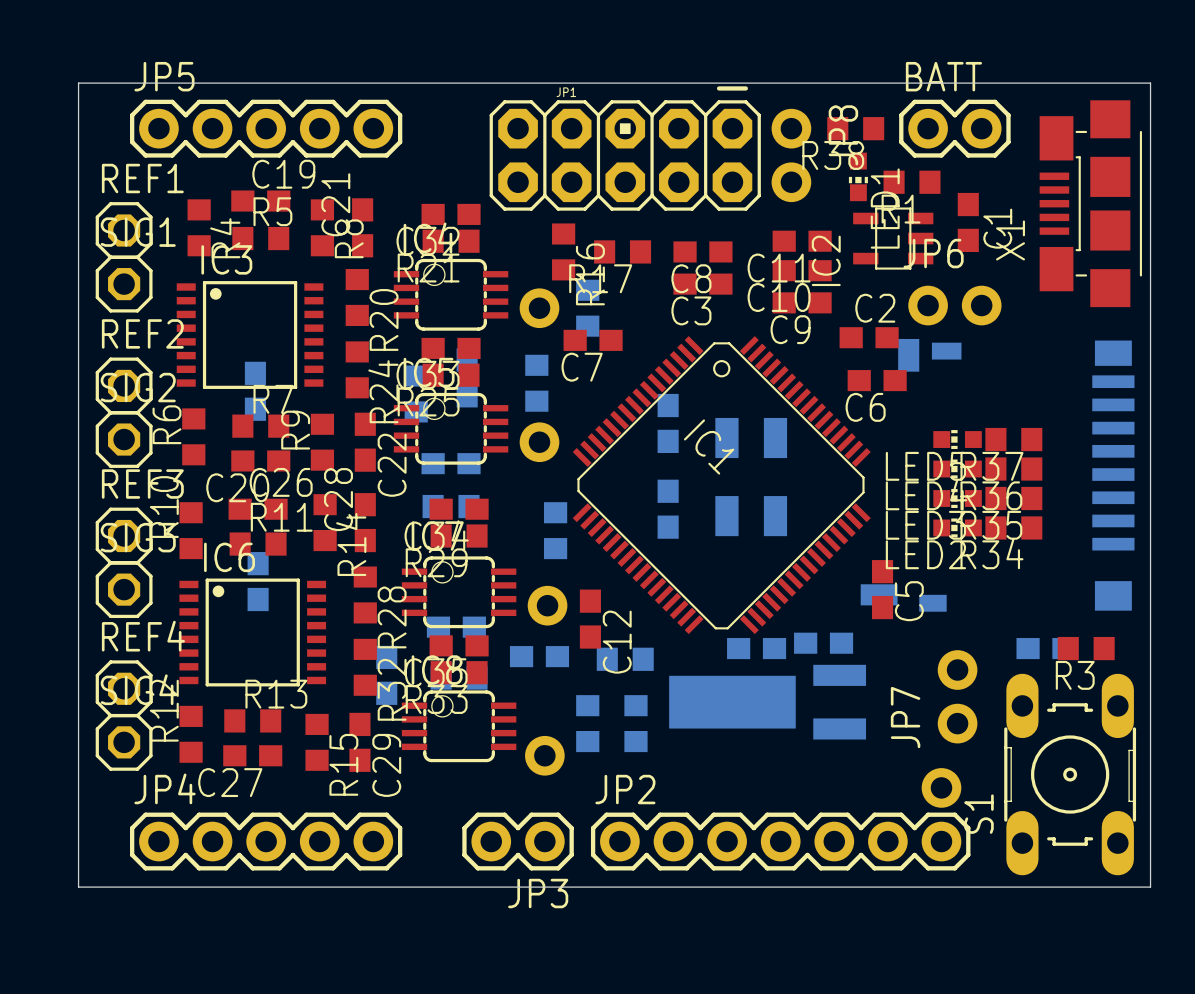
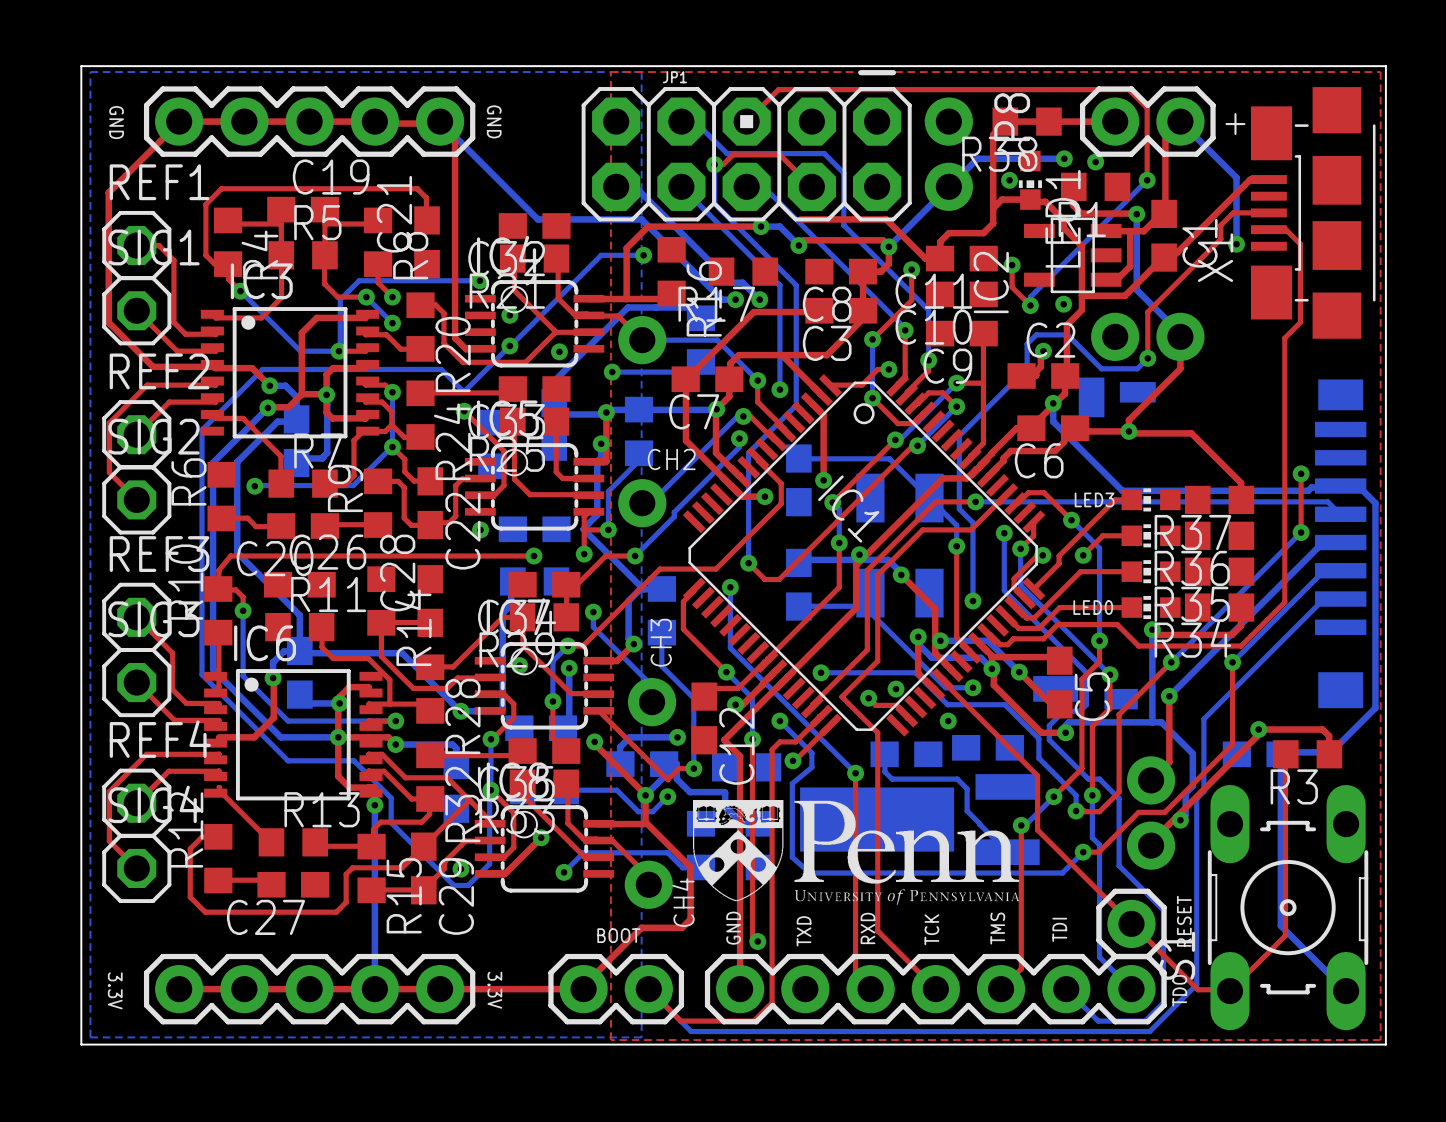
JP5 name: JP5 (164, 76) -> none
BATT name: BATT (943, 76) -> none
bottom zone outline: none -> (90, 72) (641, 72) (641, 1037) (90, 1037) (90, 72)
top zone outline: none -> (610, 72) (1380, 72) (1380, 1040) (610, 1040) (610, 72)
bottom track: none -> (440, 121) (537, 219) (641, 219) (721, 299) (735, 299)
text: none -> GND (494, 121)
bottom track: none -> (681, 121) (695, 121) (727, 153) (824, 153) (843, 173) (843, 225) (928, 310) (928, 360)
top track: none -> (746, 121) (778, 89) (1128, 89) (1147, 107) (1147, 180)
top track: none -> (1115, 121) (1004, 121) (993, 134) (993, 223) (983, 233) (948, 233) (940, 241) (940, 258) (925, 258) (886, 219) (800, 219)
top track: none -> (1180, 121) (1165, 136) (1164, 213)
bottom track: none -> (1180, 121) (1236, 177) (1236, 244)
text: none -> GND (116, 122)
text: none -> + (1235, 124)
bottom track: none -> (1064, 158) (977, 158) (888, 246)
via: none -> (1064, 158)
via: none -> (1095, 162)
top track: none -> (714, 164) (723, 164) (732, 154) (779, 154) (811, 186)
bottom track: none -> (714, 164) (714, 203) (796, 285) (796, 405) (748, 452) (748, 563)
via: none -> (714, 164)
via: none -> (1009, 180)
bottom track: none -> (1147, 180) (1030, 297) (1030, 305)
via: none -> (1147, 180)
top track: none -> (1268, 179) (1250, 179) (1172, 257) (1164, 257)
bottom track: none -> (616, 186) (635, 186) (731, 282) (742, 282) (759, 299)
bottom track: none -> (681, 186) (779, 285) (779, 389)
bottom track: none -> (746, 186) (763, 186) (905, 330)
top track: none -> (1073, 186) (1073, 205) (1081, 213) (1136, 214)
top track: none -> (993, 208) (1002, 199) (1045, 201) (1063, 220) (1063, 227) (1081, 246) (1081, 310) (1066, 325) (1066, 373) (1065, 375)
top track: none -> (1268, 212) (1233, 212) (1220, 225) (1220, 239) (1147, 312) (1147, 358)
bottom track: none -> (1136, 214) (1136, 289) (1180, 333) (1180, 336)
via: none -> (1136, 214)
top track: none -> (1164, 214) (1160, 214) (1143, 231) (1106, 230)
top track: none -> (228, 220) (231, 224) (281, 224) (281, 265) (279, 253)
top track: none -> (378, 220) (374, 224) (324, 224) (324, 265)
top track: none -> (427, 220) (426, 197) (417, 188) (221, 188) (205, 204) (205, 255) (214, 263) (228, 264) (228, 279) (240, 291)
top track: none -> (761, 226) (648, 226) (626, 248) (626, 299)
bottom track: none -> (761, 226) (779, 226) (798, 245)
via: none -> (761, 226)
top track: none -> (1269, 229) (1286, 229) (1300, 244) (1300, 322) (1284, 338) (1284, 602) (1241, 646) (1138, 646) (1117, 624) (1057, 624) (1043, 638) (1013, 638) (1007, 644) (1000, 644) (988, 634)
top track: none -> (1130, 231) (1130, 266) (1117, 279) (1106, 279)
via: none -> (1236, 244)
top track: none -> (136, 245) (158, 245) (173, 260) (173, 322) (185, 334) (215, 334)
top track: none -> (798, 245) (804, 240) (882, 240) (888, 246) (888, 263) (881, 271) (863, 271) (863, 318) (826, 355) (738, 355) (730, 363) (729, 396) (716, 409) (716, 452) (739, 476)
via: none -> (798, 245)
via: none -> (888, 246)
bottom track: none -> (643, 255) (601, 255) (464, 391) (441, 369) (262, 369) (202, 430) (202, 674) (288, 760) (353, 760) (391, 798) (391, 822) (453, 885) (468, 885) (489, 863) (490, 739)
via: none -> (643, 255)
top track: none -> (1164, 257) (1124, 295) (1081, 295)
top track: none -> (512, 258) (514, 260) (514, 290) (555, 332)
top track: none -> (556, 258) (558, 260) (558, 298) (573, 314) (618, 315) (642, 340)
top track: none -> (380, 263) (378, 264) (378, 282) (392, 297)
top track: none -> (1012, 265) (1012, 287) (1030, 305)
via: none -> (1012, 265)
top track: none -> (281, 266) (281, 297) (261, 317) (215, 318)
top track: none -> (324, 265) (324, 255) (324, 284) (337, 297) (366, 297)
top track: none -> (911, 269) (911, 300) (872, 339)
via: none -> (911, 269)
JP6 name: JP6 (933, 253) -> none
bottom track: none -> (479, 280) (359, 280) (340, 299) (338, 351) (300, 351) (240, 291)
via: none -> (479, 280)
via: none -> (240, 291)
top track: none -> (671, 293) (671, 299) (588, 298)
bottom track: none -> (366, 297) (392, 323)
via: none -> (366, 297)
via: none -> (392, 297)
via: none -> (735, 299)
via: none -> (759, 299)
via: none -> (1063, 304)
top track: none -> (420, 304) (435, 304) (444, 313) (444, 343) (462, 362) (525, 362) (555, 332)
via: none -> (1030, 305)
top track: none -> (136, 310) (177, 351) (215, 351)
top track: none -> (819, 310) (753, 312) (685, 379)
via: none -> (509, 315)
top track: none -> (365, 318) (316, 317) (301, 332) (301, 394)
bottom track: none -> (701, 318) (690, 307) (627, 307) (554, 380) (554, 414) (603, 414) (609, 409) (639, 409)
via: none -> (392, 323)
top track: none -> (905, 330) (905, 376) (897, 385)
via: none -> (905, 330)
top track: none -> (555, 332) (588, 332)
top track: none -> (983, 333) (983, 443) (970, 458)
top track: none -> (365, 334) (386, 334) (400, 349) (420, 349)
top track: none -> (1180, 336) (1180, 368) (1128, 420) (1128, 431)
bottom track: none -> (872, 339) (872, 398)
via: none -> (872, 339)
bottom track: none -> (642, 340) (717, 340) (757, 380)
via: none -> (509, 345)
top track: none -> (480, 348) (465, 348) (455, 338) (455, 136) (440, 121) (437, 123) (179, 121) (108, 192) (108, 322) (153, 366) (252, 368) (269, 385)
top track: none -> (338, 351) (365, 351)
via: none -> (338, 351)
via: none -> (559, 351)
top track: none -> (1043, 351) (1040, 353) (1040, 366) (1036, 371) (1036, 375) (1021, 375)
via: none -> (1043, 351)
top track: none -> (781, 355) (821, 394)
bottom track: none -> (1147, 358) (1137, 368) (1101, 368) (1067, 334) (1036, 334) (1027, 344) (1027, 368) (959, 436) (959, 509) (973, 522) (973, 601)
via: none -> (1147, 358)
top track: none -> (928, 360) (928, 370) (906, 394)
via: none -> (928, 360)
bottom track: none -> (701, 361) (690, 372) (612, 372)
top track: none -> (365, 368) (333, 368) (326, 374) (326, 412) (332, 418) (365, 418)
top track: none -> (888, 369) (877, 369) (862, 385) (830, 385)
via: none -> (888, 369)
via: none -> (612, 372)
top track: none -> (1064, 375) (1064, 393) (1031, 428) (1016, 428) (967, 478) (943, 478) (856, 565) (856, 608) (724, 739) (740, 756) (740, 989)
top track: none -> (686, 379) (686, 440) (742, 496) (764, 496)
top track: none -> (757, 380) (757, 402) (785, 430)
via: none -> (757, 380)
top track: none -> (956, 383) (983, 383)
bottom track: none -> (956, 383) (899, 439) (895, 439)
via: none -> (956, 383)
top track: none -> (215, 385) (147, 385) (109, 422) (109, 472) (136, 499)
bottom track: none -> (269, 385) (285, 385) (296, 396) (296, 414)
via: none -> (269, 385)
top track: none -> (365, 385) (385, 385) (392, 392)
top track: none -> (512, 389) (508, 392) (420, 392)
via: none -> (779, 389)
bottom track: none -> (392, 392) (392, 447) (353, 485) (254, 486)
via: none -> (392, 392)
top track: none -> (301, 394) (326, 394)
top track: none -> (301, 394) (288, 407) (267, 407)
bottom track: none -> (326, 394) (327, 452) (322, 458) (296, 458)
via: none -> (326, 394)
top track: none -> (872, 398) (897, 423) (912, 423) (924, 413)
via: none -> (872, 398)
top track: none -> (215, 401) (169, 402) (136, 434)
top track: none -> (365, 401) (382, 402) (391, 411) (391, 424)
top track: none -> (812, 404) (823, 415) (823, 480)
top track: none -> (915, 403) (928, 392) (943, 392) (956, 406)
bottom track: none -> (1053, 403) (1053, 421) (1122, 490) (1308, 490) (1311, 487) (1340, 486)
via: none -> (1053, 403)
bottom track: none -> (956, 406) (917, 445)
via: none -> (956, 406)
bottom track: none -> (267, 407) (213, 462) (213, 669) (280, 737) (338, 737)
via: none -> (267, 407)
bottom track: none -> (716, 409) (639, 409)
via: none -> (716, 409)
top track: none -> (464, 411) (504, 451) (504, 485) (494, 494) (480, 494)
via: none -> (464, 411)
top track: none -> (606, 412) (606, 461) (588, 461)
via: none -> (606, 412)
bottom track: none -> (296, 414) (289, 421) (277, 421) (237, 462) (237, 552) (299, 615) (299, 651) (284, 651) (273, 662) (273, 677)
top track: none -> (743, 416) (750, 416) (776, 440)
bottom track: none -> (743, 416) (737, 416) (650, 503) (642, 503)
via: none -> (743, 416)
top track: none -> (215, 418) (243, 418) (280, 456) (280, 483)
top track: none -> (512, 421) (514, 423) (514, 479) (530, 494) (588, 494)
top track: none -> (556, 421) (556, 471) (562, 478) (588, 478)
top track: none -> (391, 424) (404, 437) (420, 437)
top track: none -> (391, 424) (385, 431) (363, 431) (353, 440) (353, 475) (344, 485) (327, 485) (324, 483)
top track: none -> (1128, 431) (1131, 433) (1191, 433) (1241, 482) (1241, 499)
top track: none -> (1128, 431) (1088, 431) (1085, 428) (1064, 428) (1064, 441) (1055, 451) (1010, 451) (988, 476)
via: none -> (1128, 431)
bottom track: none -> (739, 438) (739, 447) (674, 512) (674, 516) (635, 556)
via: none -> (739, 438)
top track: none -> (895, 439) (832, 502)
via: none -> (895, 439)
bottom track: none -> (601, 443) (601, 457) (597, 461) (597, 514) (583, 529) (643, 589) (661, 589)
via: none -> (601, 443)
top track: none -> (917, 445) (912, 445) (779, 579) (764, 579) (748, 563)
via: none -> (917, 445)
top track: none -> (392, 447) (404, 459) (404, 471) (414, 481) (430, 481)
via: none -> (392, 447)
bottom track: none -> (639, 453) (639, 460) (608, 491) (608, 529)
top track: none -> (757, 458) (781, 483) (781, 503) (716, 569) (659, 569) (582, 646) (567, 646)
bottom track: none -> (798, 458) (889, 458) (956, 525) (956, 546)
text: none -> CH2 (671, 459)
top track: none -> (1301, 473) (1301, 532)
via: none -> (1301, 473)
top track: none -> (479, 479) (462, 479) (455, 485) (455, 516) (449, 522) (431, 522) (430, 525)
via: none -> (823, 480)
top track: none -> (378, 481) (398, 481) (404, 487) (404, 518) (411, 525) (429, 525)
via: none -> (254, 486)
bottom track: none -> (1340, 486) (1358, 486) (1375, 503) (1375, 708) (1331, 752) (1283, 752) (1280, 754)
top track: none -> (1006, 494) (971, 529) (922, 529) (877, 574) (877, 661) (841, 696) (877, 732) (877, 931) (935, 989)
via: none -> (764, 496)
top track: none -> (1131, 499) (1115, 499) (1059, 556) (1059, 563) (1033, 588)
bottom track: none -> (832, 502) (839, 509) (839, 542)
via: none -> (832, 502)
top track: none -> (975, 501) (935, 501) (867, 570) (867, 649) (812, 706)
bottom track: none -> (975, 501) (1327, 501) (1340, 514)
via: none -> (975, 501)
top track: none -> (1015, 503) (1028, 492) (1044, 492) (1071, 520)
top track: none -> (588, 512) (584, 516) (584, 554)
top track: none -> (221, 518) (247, 518) (256, 526) (280, 526) (279, 518)
bottom track: none -> (1071, 520) (1099, 548) (1099, 640)
via: none -> (1071, 520)
top track: none -> (1033, 522) (1033, 535) (1020, 548)
top track: none -> (378, 524) (324, 526)
via: none -> (480, 529)
top track: none -> (584, 529) (608, 529)
via: none -> (608, 529)
bottom track: none -> (1004, 533) (1004, 590) (1086, 672) (1086, 704) (1079, 711) (1063, 711) (1049, 725) (1049, 739) (1088, 779) (1099, 779) (1119, 798) (1119, 865) (1163, 910) (1163, 1002) (1145, 1021) (1098, 1021) (1066, 989)
via: none -> (1004, 533)
LED5 name: LED5 (925, 466) -> LED3 (1094, 499)
bottom track: none -> (1301, 532) (1171, 662)
via: none -> (1301, 532)
top track: none -> (1131, 535) (1102, 535) (1083, 555)
top track: none -> (839, 542) (839, 587) (738, 688) (712, 688) (704, 696)
via: none -> (839, 542)
bottom track: none -> (1340, 542) (1322, 542) (1169, 696)
top track: none -> (956, 546) (956, 637) (970, 652)
via: none -> (956, 546)
bottom track: none -> (1020, 548) (1020, 585) (1109, 674)
via: none -> (1020, 548)
via: none -> (584, 554)
via: none -> (859, 554)
top track: none -> (534, 556) (230, 556) (218, 570) (218, 588)
via: none -> (534, 556)
top track: none -> (635, 556) (605, 556) (577, 584) (566, 584) (566, 617)
via: none -> (635, 556)
top track: none -> (1042, 555) (1037, 555) (1014, 578) (1014, 587) (1024, 597)
via: none -> (1042, 555)
via: none -> (1083, 555)
bottom track: none -> (798, 562) (801, 559) (888, 559) (901, 574)
via: none -> (748, 563)
LED4 name: LED4 (926, 495) -> none
bottom track: none -> (1340, 570) (1323, 571) (1232, 662)
top track: none -> (1131, 571) (1080, 571) (1034, 617) (1026, 617) (1015, 607)
top track: none -> (901, 574) (935, 608) (935, 653) (952, 670)
via: none -> (901, 574)
bottom track: none -> (512, 581) (511, 604) (502, 613) (502, 708) (500, 711) (460, 711) (402, 653) (302, 653) (298, 647) (298, 642)
bottom track: none -> (641, 587) (628, 601) (628, 638) (633, 644)
bottom track: none -> (730, 587) (730, 647) (855, 773)
via: none -> (730, 587)
top track: none -> (218, 588) (235, 589) (243, 597) (243, 610)
top track: none -> (694, 588) (683, 601) (683, 629) (726, 672)
bottom track: none -> (1340, 599) (1323, 599) (1203, 719) (1203, 791) (1196, 798) (1196, 984) (1149, 1031) (691, 1031) (648, 989)
via: none -> (973, 601)
LED3 name: LED3 (925, 525) -> none
bottom track: none -> (798, 606) (868, 606) (870, 593) (870, 612) (945, 687) (973, 687)
top track: none -> (1131, 607) (1059, 607) (1038, 628) (1018, 628) (1006, 616)
top track: none -> (1241, 607) (1241, 625) (1231, 634) (1157, 634) (1152, 629)
bottom track: none -> (243, 610) (243, 676) (288, 721) (395, 721)
via: none -> (243, 610)
bottom track: none -> (593, 612) (593, 627) (652, 685) (652, 702)
via: none -> (593, 612)
top track: none -> (136, 617) (172, 653) (172, 689) (186, 703) (218, 703)
top track: none -> (430, 622) (381, 622) (381, 656) (413, 688) (447, 688) (457, 677) (490, 677)
top track: none -> (322, 627) (322, 647) (333, 658) (368, 658) (389, 679) (389, 704)
bottom track: none -> (1152, 629) (1152, 722)
via: none -> (1152, 629)
top track: none -> (218, 632) (218, 687)
bottom track: none -> (661, 632) (661, 666) (693, 698) (693, 768)
top track: none -> (918, 636) (918, 673) (933, 688)
bottom track: none -> (918, 636) (918, 644) (931, 657) (980, 657) (991, 668)
via: none -> (918, 636)
LED2 name: LED2 (925, 554) -> LED0 (1093, 607)
bottom track: none -> (940, 640) (988, 640) (1019, 672)
via: none -> (940, 640)
top track: none -> (1099, 640) (1099, 661) (1081, 679) (1081, 768) (1053, 796)
via: none -> (1099, 640)
text: none -> CH3 (661, 642)
top track: none -> (633, 644) (616, 661) (598, 660)
via: none -> (633, 644)
top track: none -> (979, 643) (991, 655) (993, 685) (1041, 732) (1065, 732)
bottom track: none -> (567, 646) (552, 661) (552, 701)
via: none -> (567, 646)
top track: none -> (991, 657) (1056, 657) (1059, 660)
top track: none -> (1171, 662) (1119, 714) (1119, 792) (1099, 811) (1076, 811)
via: none -> (1171, 662)
top track: none -> (1232, 662) (1232, 744) (1164, 812) (1138, 812) (1098, 852) (1083, 852)
via: none -> (1232, 662)
via: none -> (519, 665)
top track: none -> (430, 666) (453, 666) (502, 617) (522, 617) (522, 645) (571, 693) (598, 693)
bottom track: none -> (569, 668) (569, 723) (574, 728)
via: none -> (569, 668)
via: none -> (991, 668)
top track: none -> (776, 670) (742, 704) (735, 704)
bottom track: none -> (726, 672) (752, 698) (752, 739)
via: none -> (726, 672)
bottom track: none -> (821, 672) (915, 672) (947, 704) (1004, 704) (1038, 738) (1038, 758) (1076, 795) (1076, 811)
via: none -> (821, 672)
top track: none -> (1019, 672) (1051, 704) (1059, 704)
via: none -> (1019, 672)
top track: none -> (1109, 674) (1109, 708) (1092, 726) (1092, 795)
via: none -> (1109, 674)
top track: none -> (273, 677) (273, 717) (254, 737) (219, 737)
via: none -> (273, 677)
top track: none -> (943, 679) (1037, 775) (1037, 829) (1198, 989) (1230, 991) (1285, 935) (1285, 754)
top track: none -> (136, 682) (174, 720) (218, 720)
top track: none -> (368, 687) (349, 687) (339, 696) (338, 776) (349, 787) (374, 787) (374, 805)
via: none -> (973, 687)
via: none -> (896, 689)
bottom track: none -> (299, 694) (308, 703) (339, 703)
top track: none -> (490, 694) (504, 694) (513, 704) (513, 717) (490, 739)
top track: none -> (1169, 696) (1169, 762) (1151, 780)
via: none -> (1169, 696)
top track: none -> (868, 698) (875, 705) (896, 705) (907, 715) (907, 718)
via: none -> (868, 698)
top track: none -> (552, 701) (552, 738) (565, 751)
via: none -> (552, 701)
via: none -> (339, 703)
top track: none -> (368, 704) (423, 704) (430, 710)
via: none -> (735, 704)
top track: none -> (598, 710) (667, 779) (678, 768) (693, 768)
via: none -> (460, 711)
top track: none -> (819, 716) (821, 716) (795, 741) (779, 741) (772, 749) (772, 1002) (753, 1021) (680, 1021) (648, 989)
top track: none -> (368, 721) (395, 721)
via: none -> (395, 721)
bottom track: none -> (779, 721) (811, 753) (811, 767) (792, 783) (792, 857) (809, 873) (1062, 873) (1083, 852)
via: none -> (779, 721)
via: none -> (948, 721)
top track: none -> (830, 725) (792, 760)
via: none -> (1258, 729)
bottom track: none -> (1065, 732) (1065, 725) (1068, 722) (1161, 722) (1192, 753) (1192, 786) (1185, 793) (1185, 814) (1180, 820)
via: none -> (1065, 732)
top track: none -> (338, 737) (388, 737) (395, 744)
via: none -> (338, 737)
bottom track: none -> (677, 737) (629, 737) (620, 747) (620, 763)
via: none -> (677, 737)
via: none -> (490, 739)
top track: none -> (752, 739) (752, 936) (757, 941)
via: none -> (752, 739)
top track: none -> (594, 741) (645, 795) (645, 822)
via: none -> (594, 741)
bottom track: none -> (395, 744) (452, 744) (456, 748) (456, 765)
via: none -> (395, 744)
top track: none -> (522, 751) (517, 755) (430, 755)
top track: none -> (218, 754) (146, 754) (109, 791) (109, 841) (136, 868)
top track: none -> (368, 754) (382, 754) (405, 777) (447, 777) (489, 820) (490, 823)
bottom track: none -> (884, 754) (884, 771) (892, 779) (957, 779) (967, 788) (967, 811) (1007, 852)
bottom track: none -> (1280, 754) (1280, 925) (1346, 991)
top track: none -> (1329, 754) (1329, 736) (1322, 729) (1258, 729) (1256, 736) (1151, 842) (1151, 845)
via: none -> (792, 760)
via: none -> (693, 768)
top track: none -> (219, 770) (168, 771) (136, 803)
top track: none -> (368, 770) (383, 771) (411, 798) (430, 798) (429, 814) (421, 822) (380, 822) (373, 829) (373, 839) (366, 844) (371, 846)
top track: none -> (855, 773) (855, 974) (870, 989)
via: none -> (855, 773)
top track: none -> (522, 783) (524, 796) (584, 856) (598, 856)
top track: none -> (566, 783) (567, 785) (567, 823) (583, 839) (612, 841) (648, 876) (648, 884)
top track: none -> (219, 787) (219, 790) (271, 842)
top track: none -> (490, 790) (513, 813) (513, 847) (504, 856) (490, 856)
via: none -> (490, 790)
bottom track: none -> (566, 790) (616, 790) (638, 811) (652, 811) (667, 796)
bottom track: none -> (645, 795) (664, 776) (664, 764) (676, 764) (676, 779) (689, 792) (724, 792) (725, 806) (742, 824) (759, 824)
via: none -> (645, 795)
bottom track: none -> (1092, 795) (1092, 837) (1099, 844) (1099, 957) (1131, 989)
via: none -> (1092, 795)
via: none -> (667, 796)
bottom track: none -> (1053, 796) (1025, 825) (1021, 825)
via: none -> (1053, 796)
top track: none -> (469, 800) (423, 846)
drawing: none -> [692, 800, 1020, 906]
bottom track: none -> (374, 805) (374, 989)
via: none -> (374, 805)
via: none -> (1076, 811)
via: none -> (1180, 820)
top track: none -> (645, 822) (690, 867) (690, 919) (682, 927) (641, 927) (585, 983) (583, 989) (179, 989)
top track: none -> (645, 822) (643, 824) (598, 823)
top track: none -> (1021, 825) (1021, 968) (1001, 989)
via: none -> (1021, 825)
top track: none -> (218, 837) (202, 837) (190, 848) (190, 897) (205, 912) (336, 912) (346, 902) (346, 874) (352, 867) (402, 867) (423, 846)
top track: none -> (541, 837) (505, 873) (489, 873)
via: none -> (541, 837)
JP7 name: JP7 (905, 717) -> none
top track: none -> (490, 840) (465, 841) (444, 861) (444, 868) (423, 890)
top track: none -> (315, 842) (317, 846) (371, 846)
via: none -> (1083, 852)
bottom track: none -> (700, 867) (682, 867) (667, 852) (583, 852) (564, 872)
via: none -> (460, 869)
via: none -> (564, 872)
top track: none -> (218, 880) (269, 880) (271, 884)
top track: none -> (371, 889) (423, 889)
part footprint: [921, 768, 962, 808] -> [1096, 888, 1167, 960]
text: none -> CH4 (683, 902)
text: none -> RESET (1184, 921)
JP4 name: JP4 (165, 788) -> none
JP2 name: JP2 (625, 789) -> none
text: none -> GND (733, 928)
text: none -> RXD (867, 928)
text: none -> TMS (997, 928)
text: none -> TCK (931, 929)
text: none -> TDI (1059, 929)
text: none -> TXD (804, 931)
text: none -> BOOT (618, 935)
via: none -> (757, 941)
text: none -> 3.3V (115, 990)
text: none -> 3.3V (494, 990)
text: none -> TDO (1179, 990)
JP3 name: JP3 (538, 893) -> none

